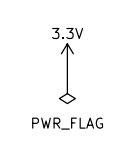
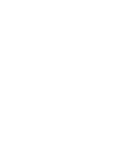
power symbol: 3.3V (67, 53) -> none
wire: (67, 63) (67, 83) -> none
power symbol: PWR_FLAG (67, 93) -> none

